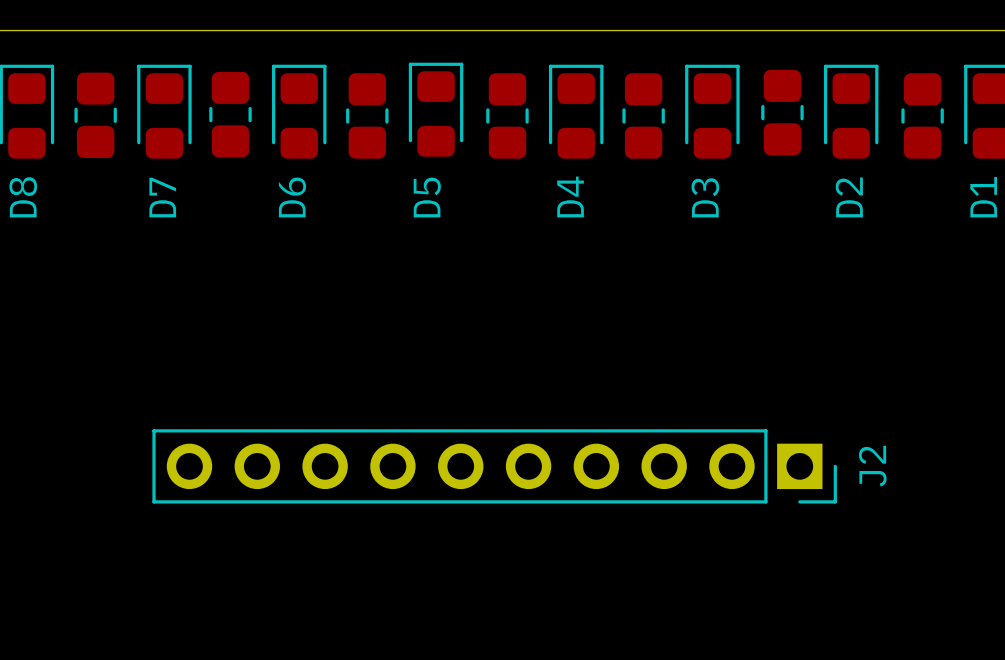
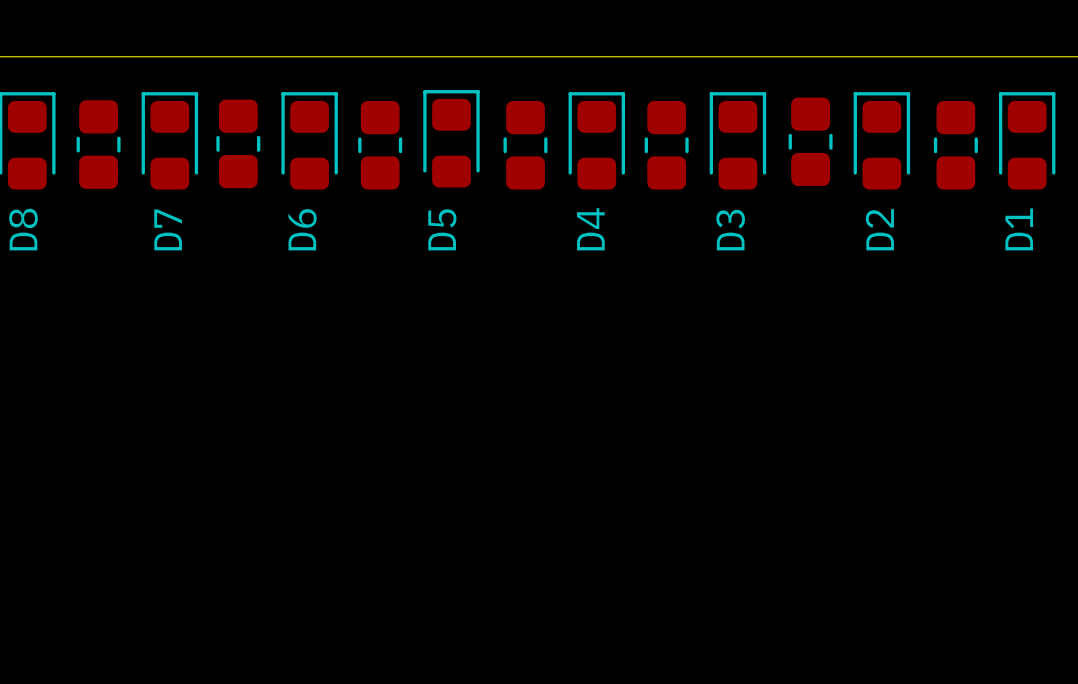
J2: (494, 466) -> none

